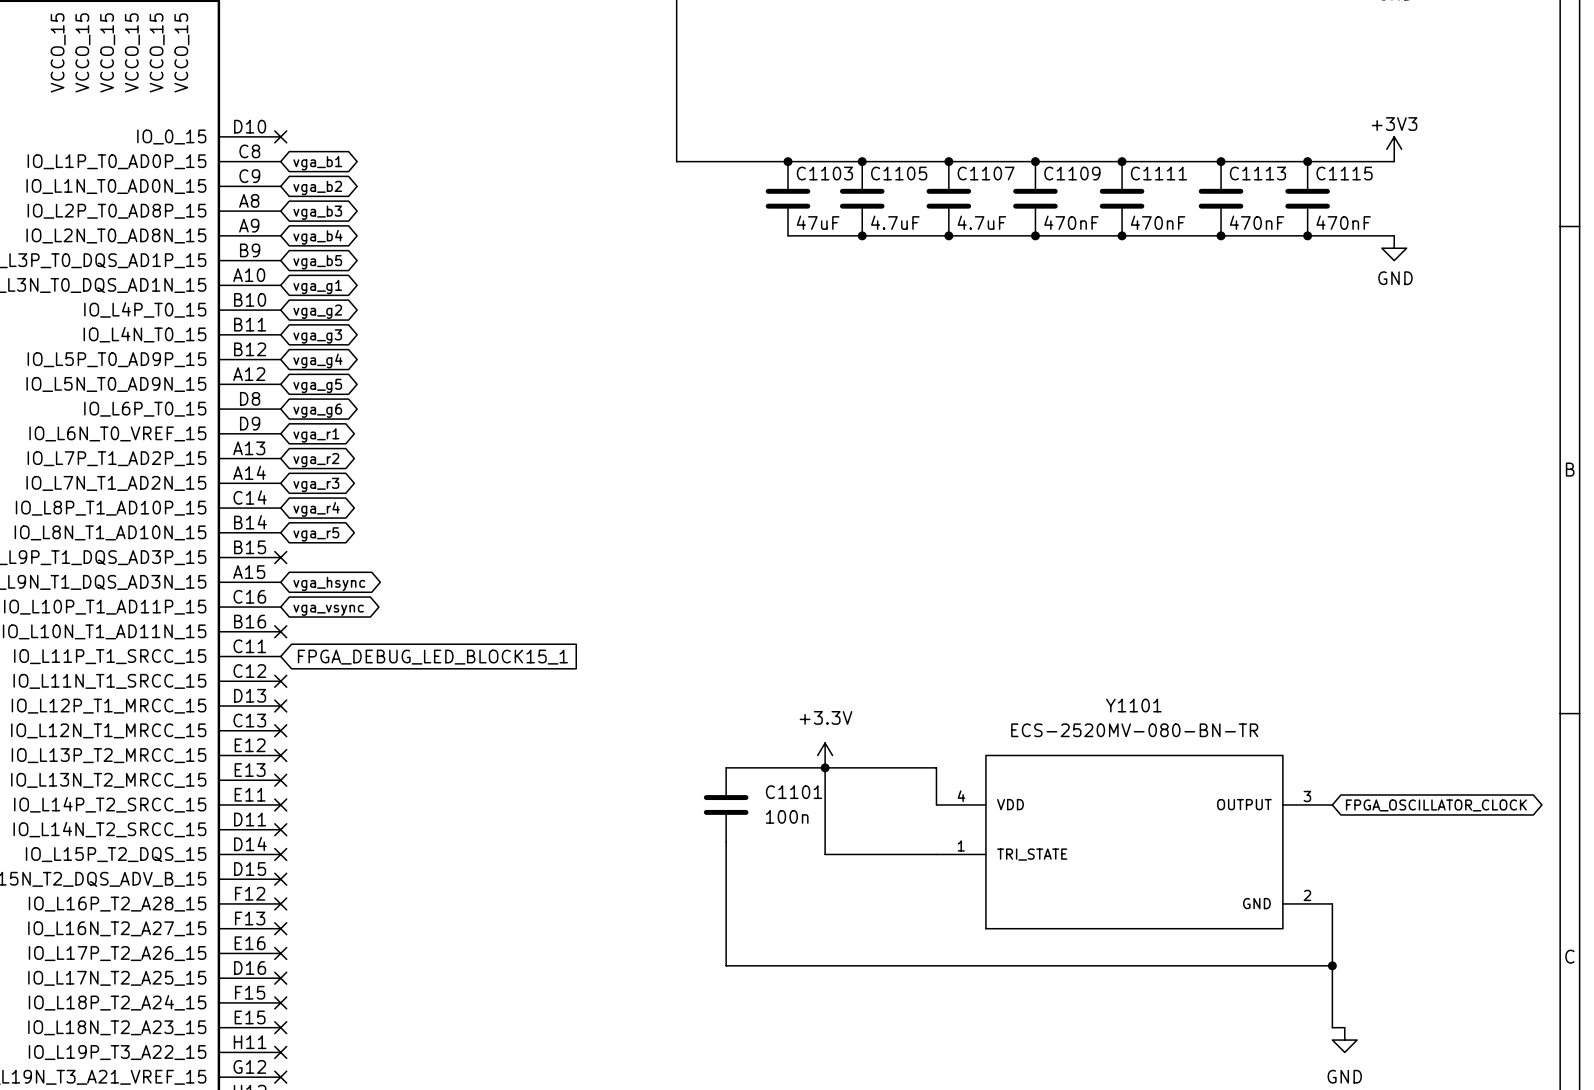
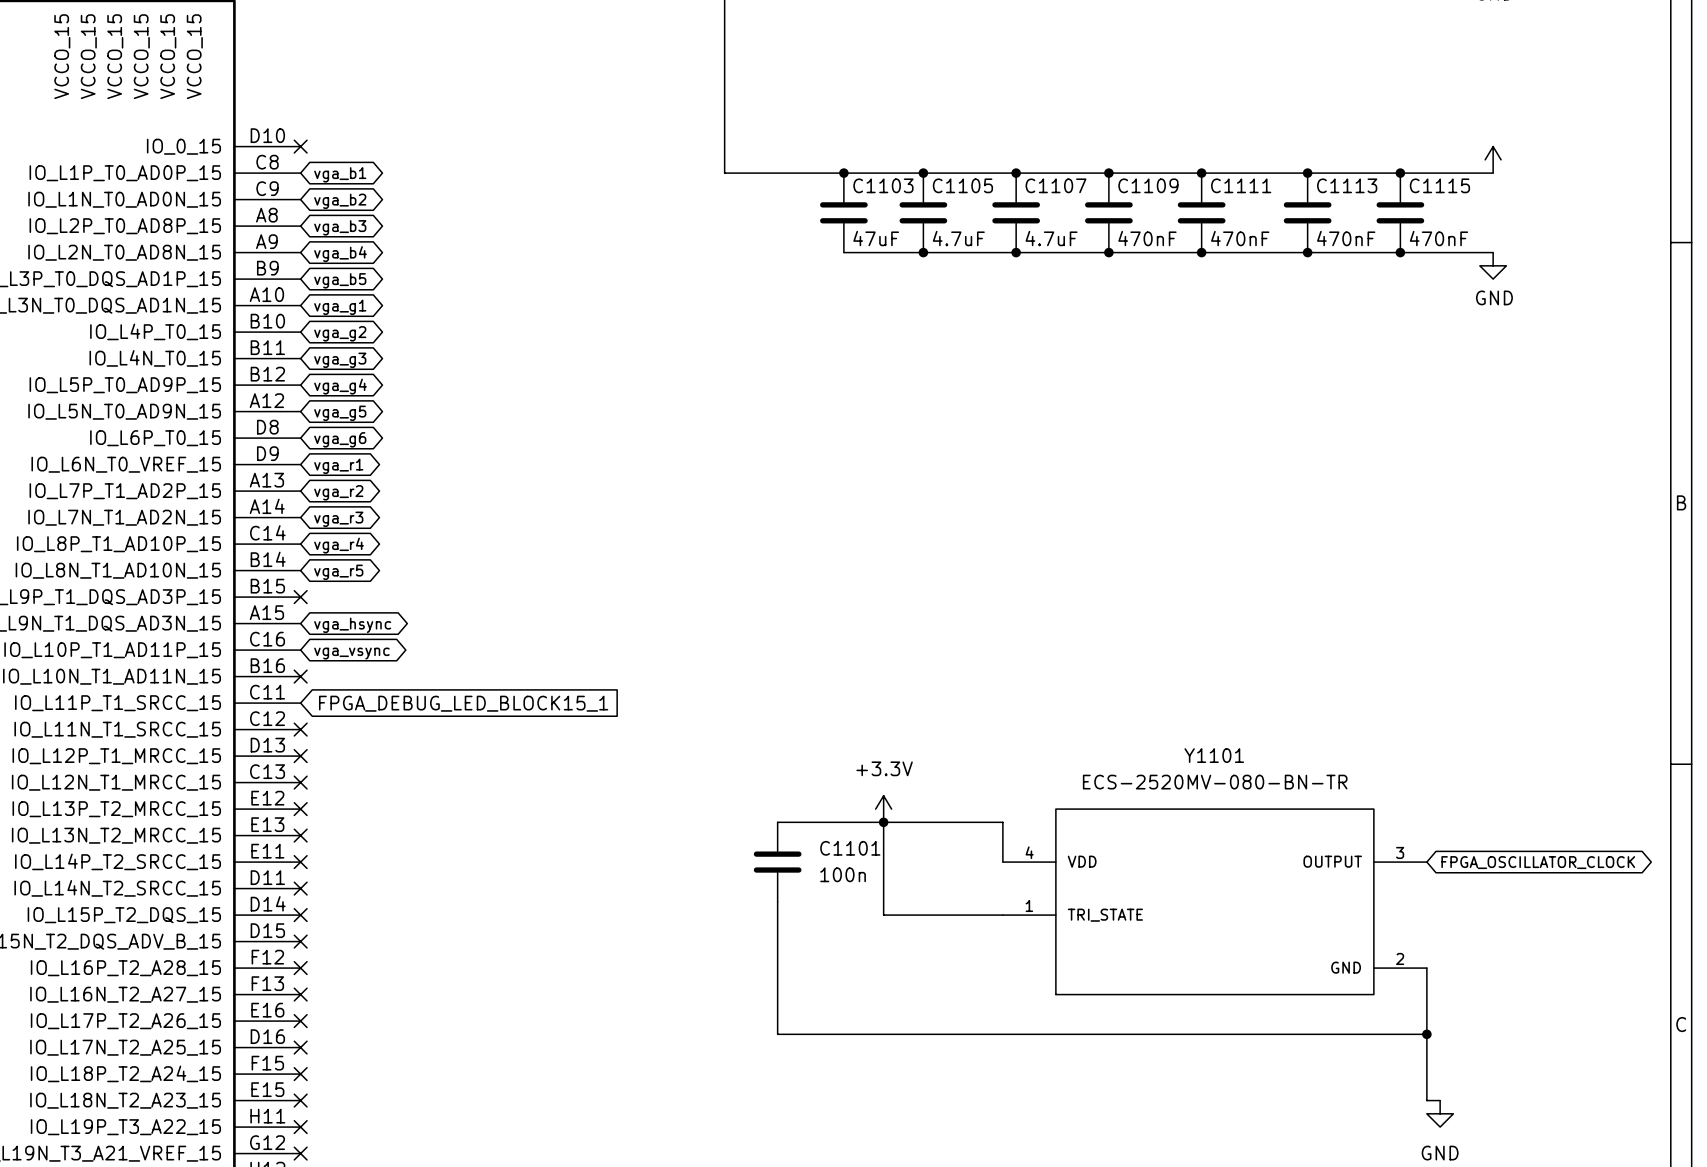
power symbol text: +3V3 (1394, 124) -> none

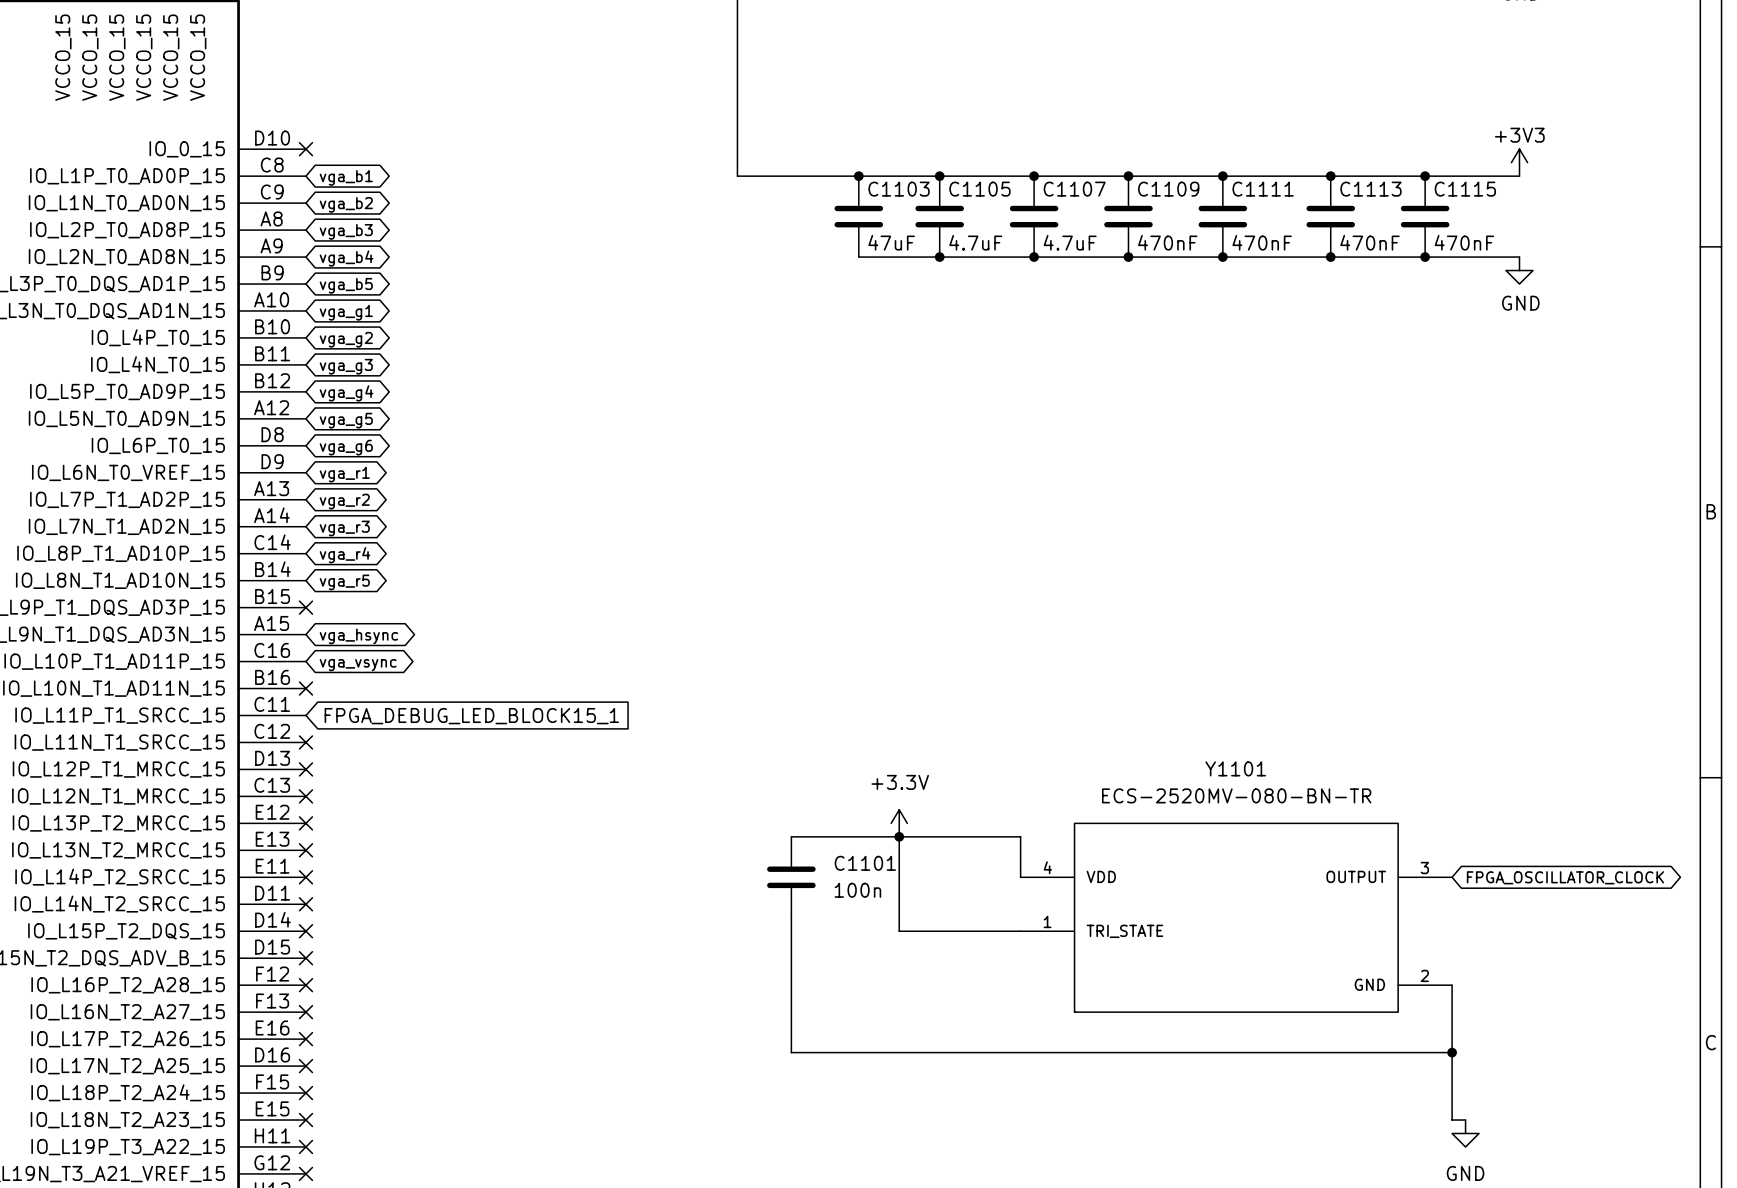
power symbol text: none -> +3V3 (1519, 135)

